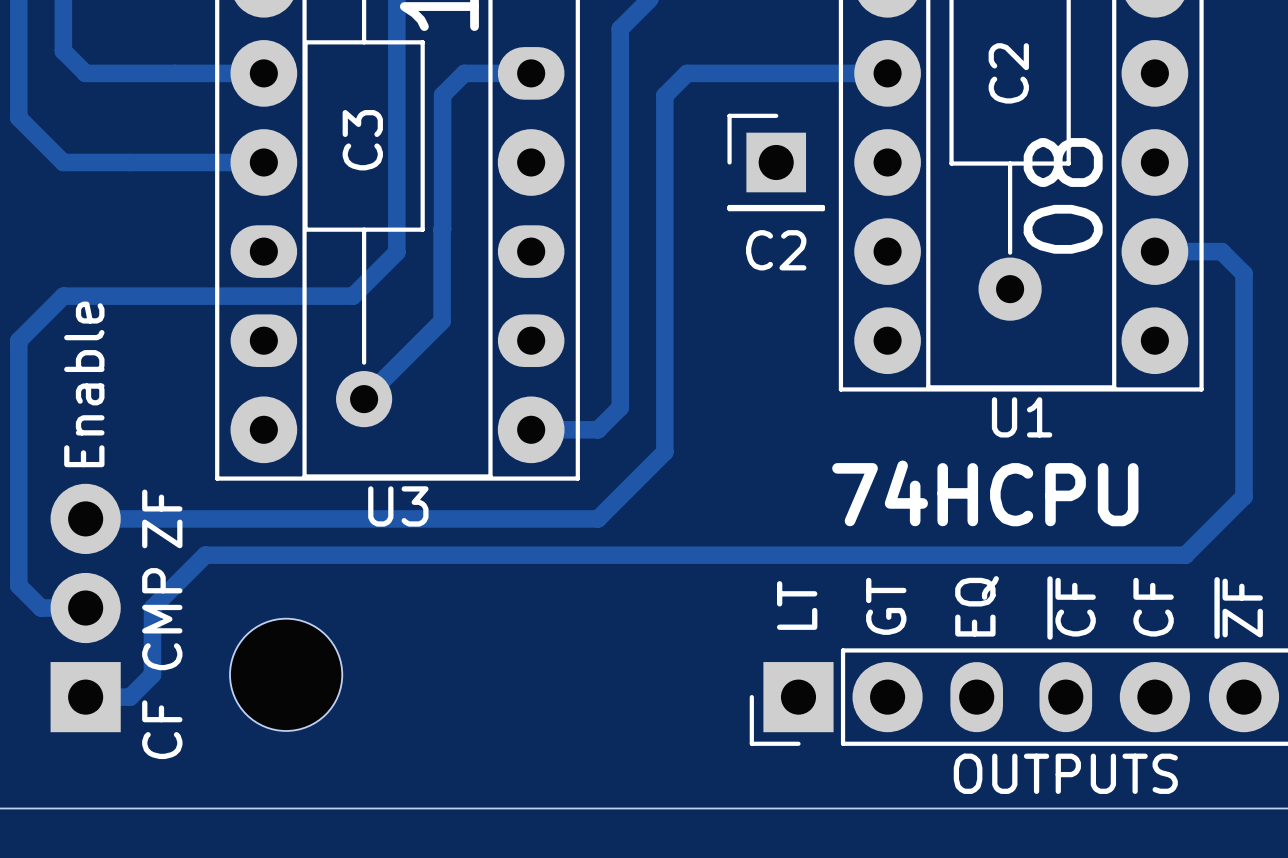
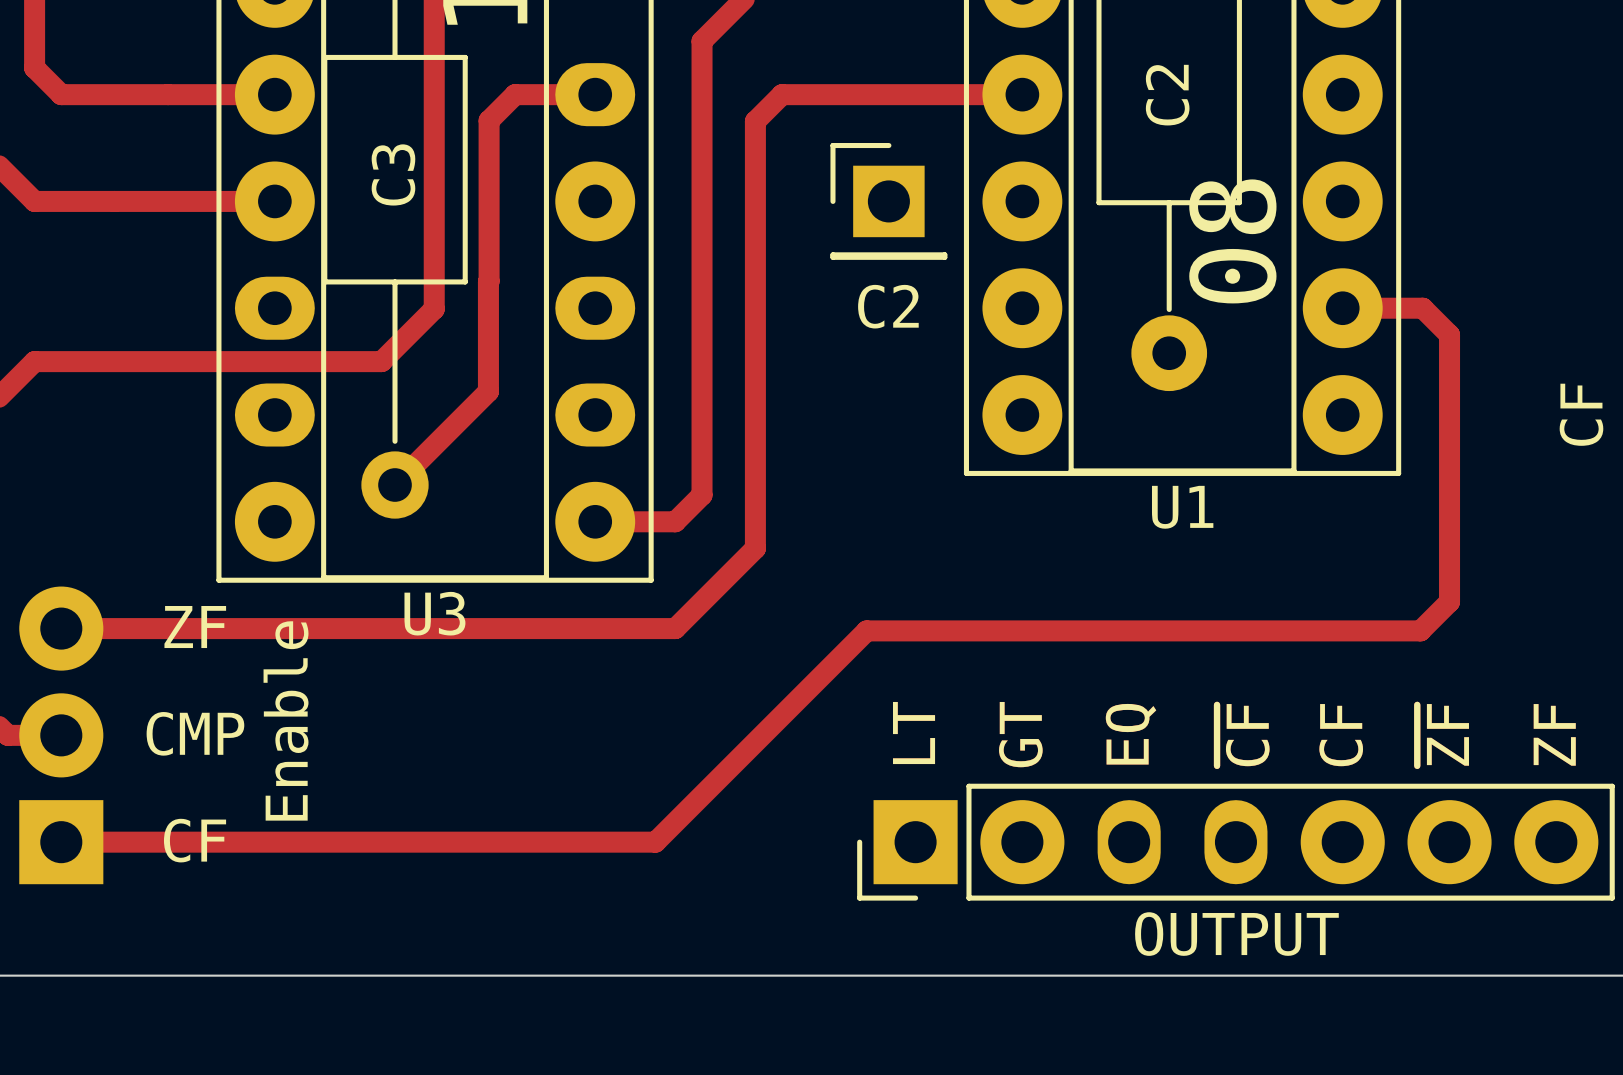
text position: Enable (84, 384) -> Enable (286, 720)
text: 74HCPU (985, 493) -> none
text rotation: 0° (162, 518) -> 90° clockwise (195, 627)
track: (1219, 520) (1185, 555) (205, 555) (152, 608) (152, 674) (130, 697) -> (1420, 630) (866, 630) (655, 842) (114, 842)
text rotation: 0° (162, 619) -> 90° clockwise (195, 733)
part: (286, 674) -> none
text rotation: 0° (162, 729) -> 90° clockwise (195, 840)
text: OUTPUTS (1065, 773) -> OUTPUT (1236, 934)

